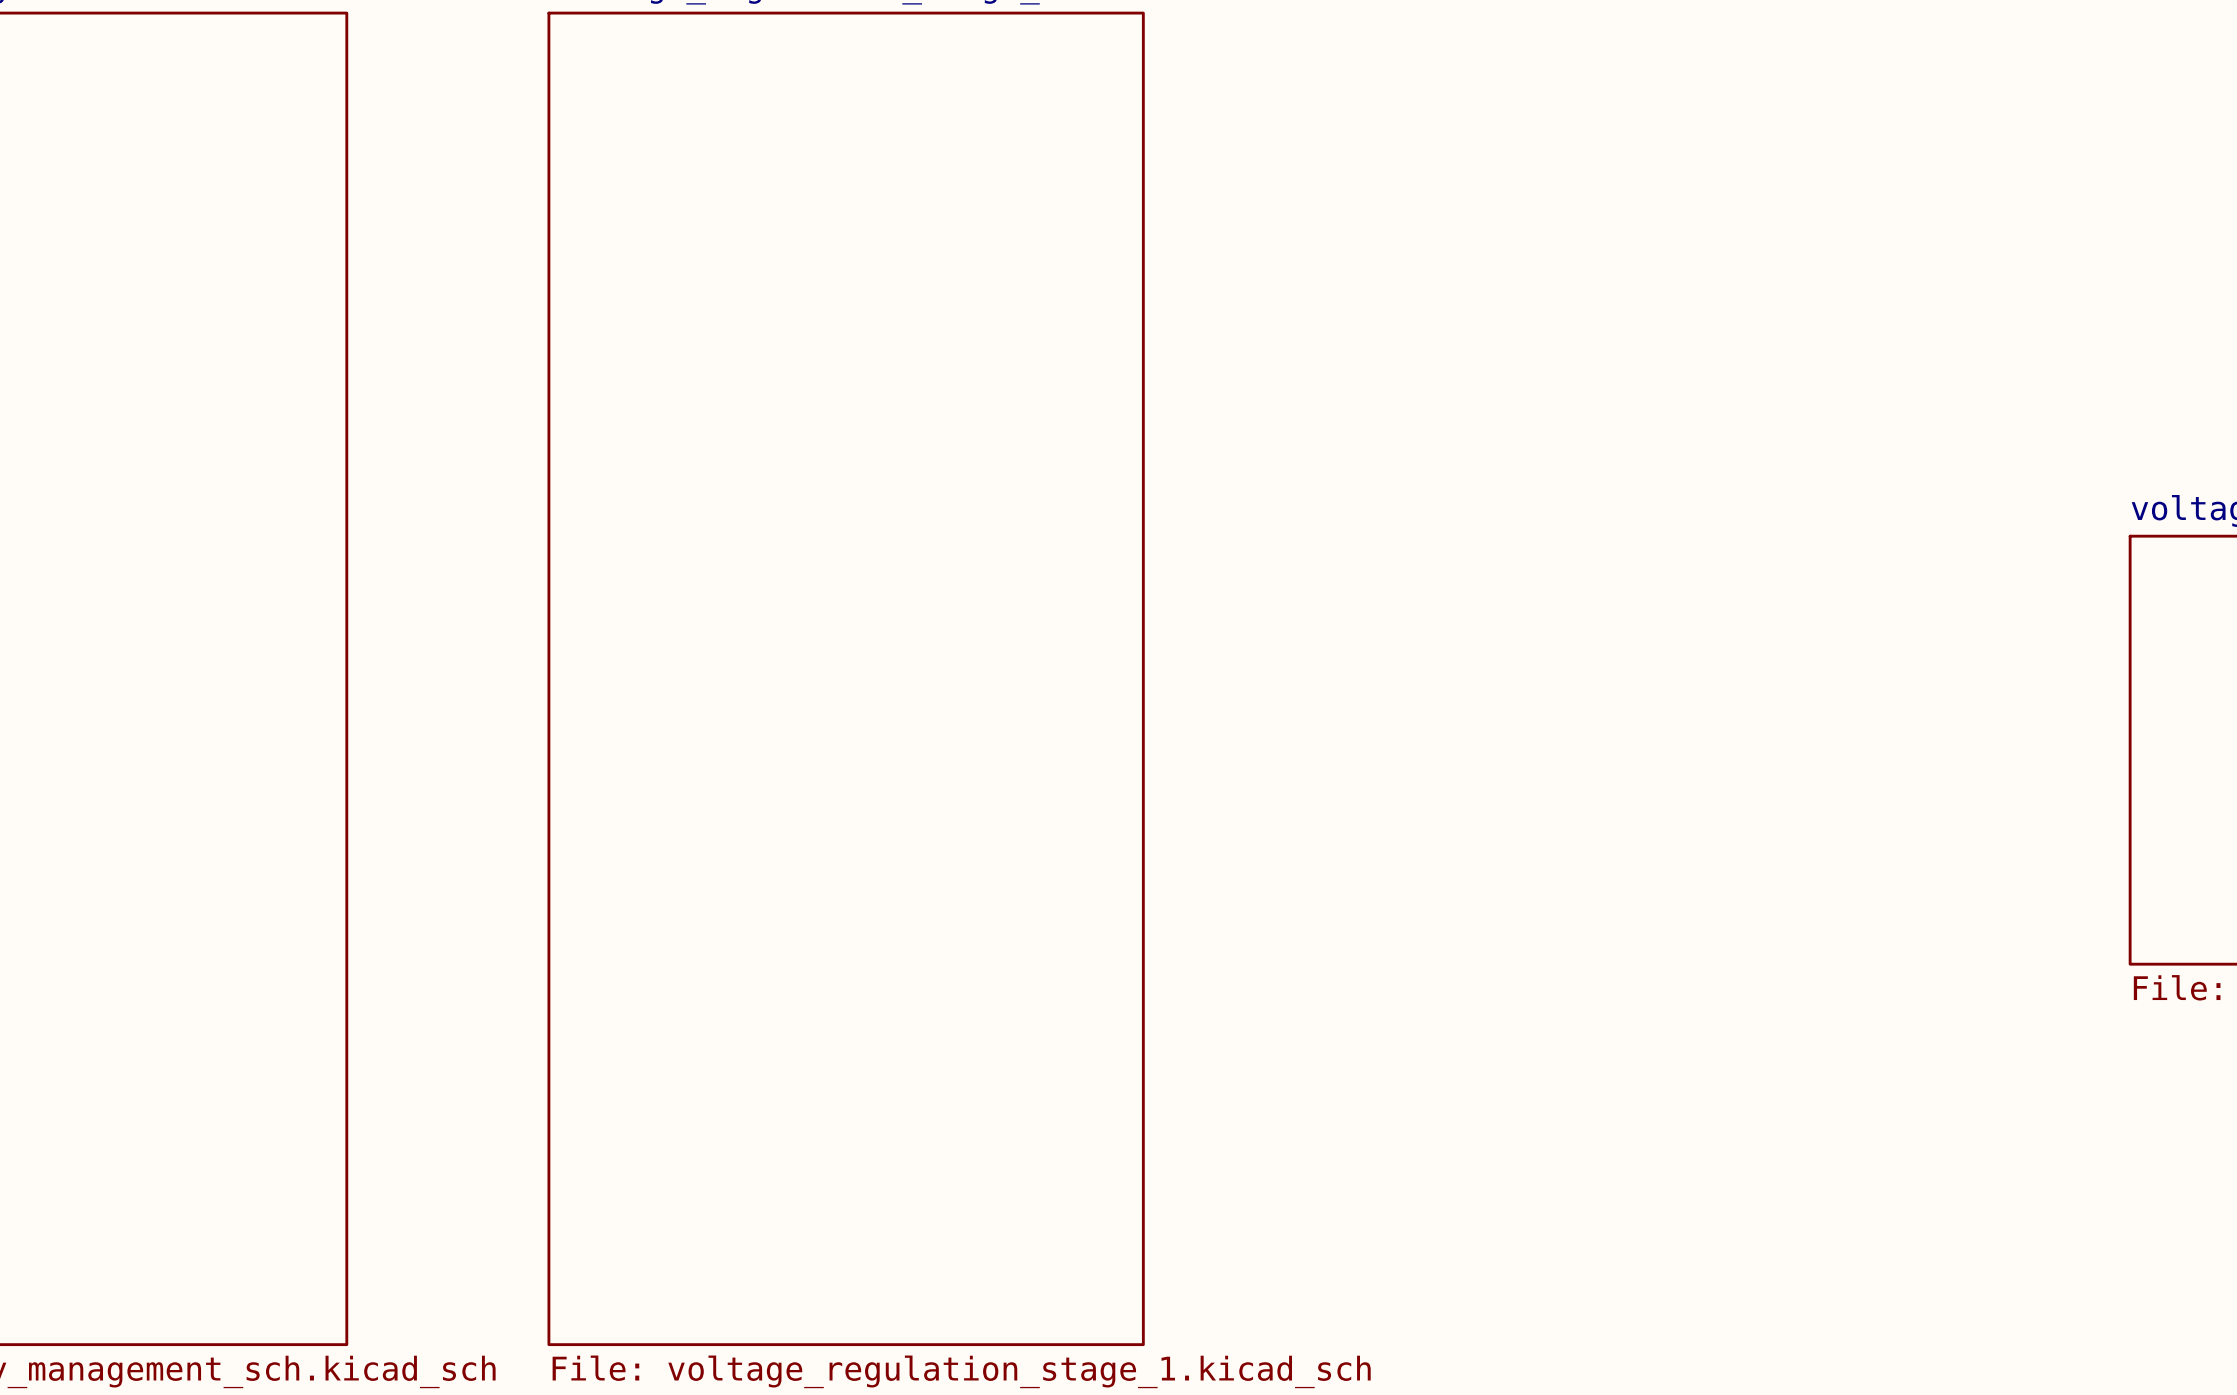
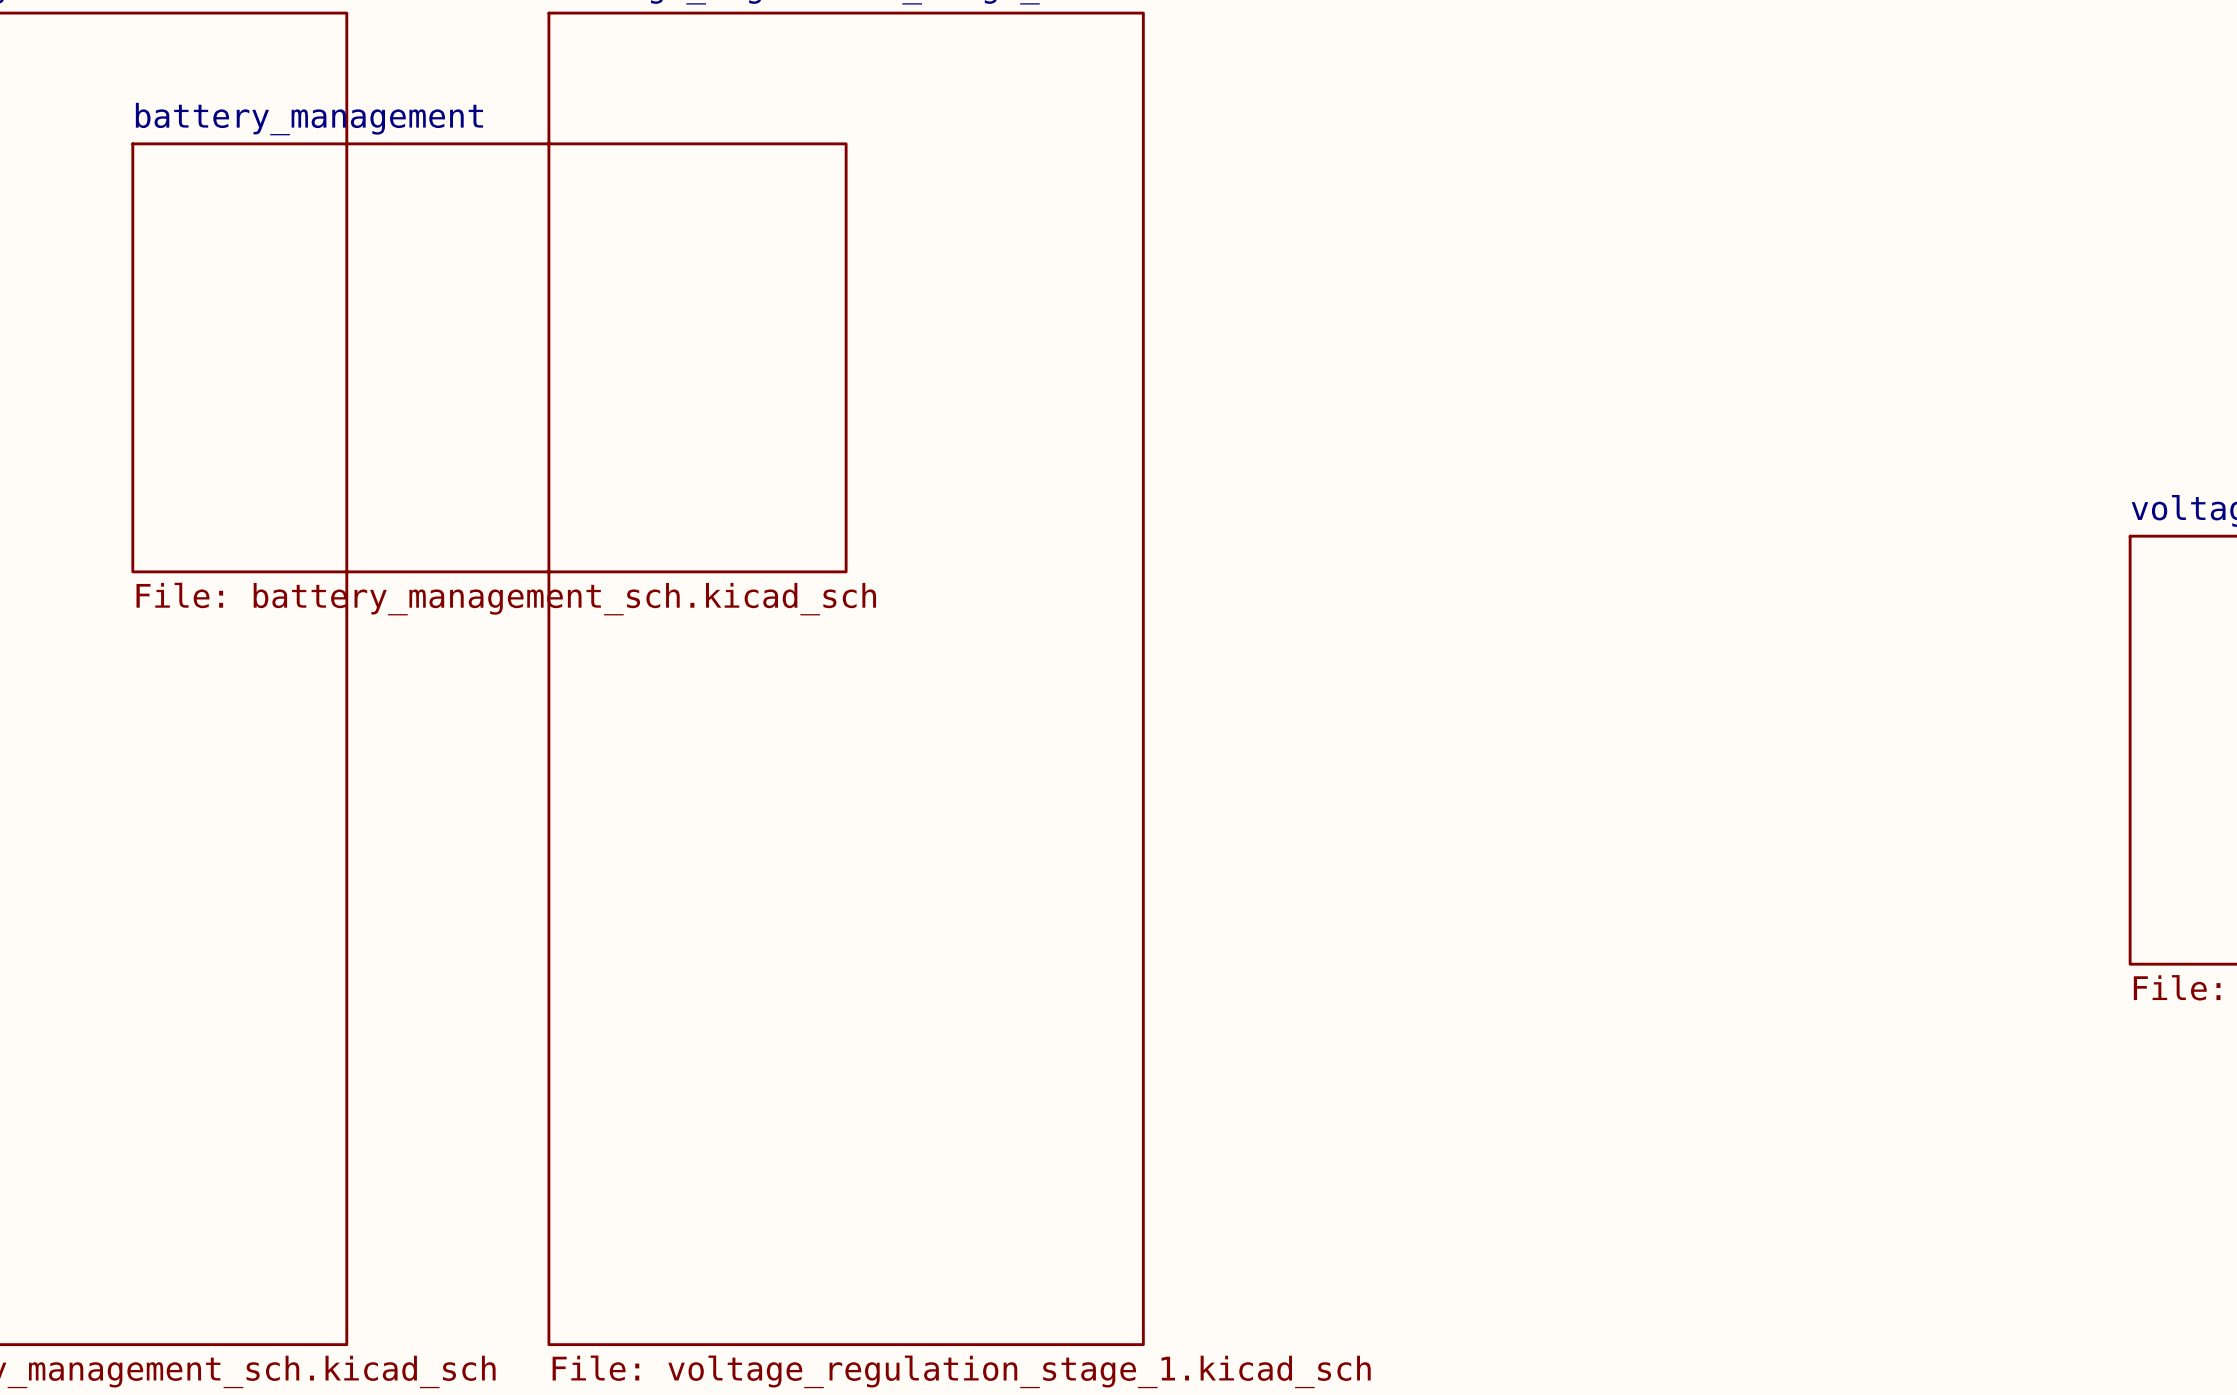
sheet battery_management: none -> File: battery_management_sch.kicad_sch (489, 357)

